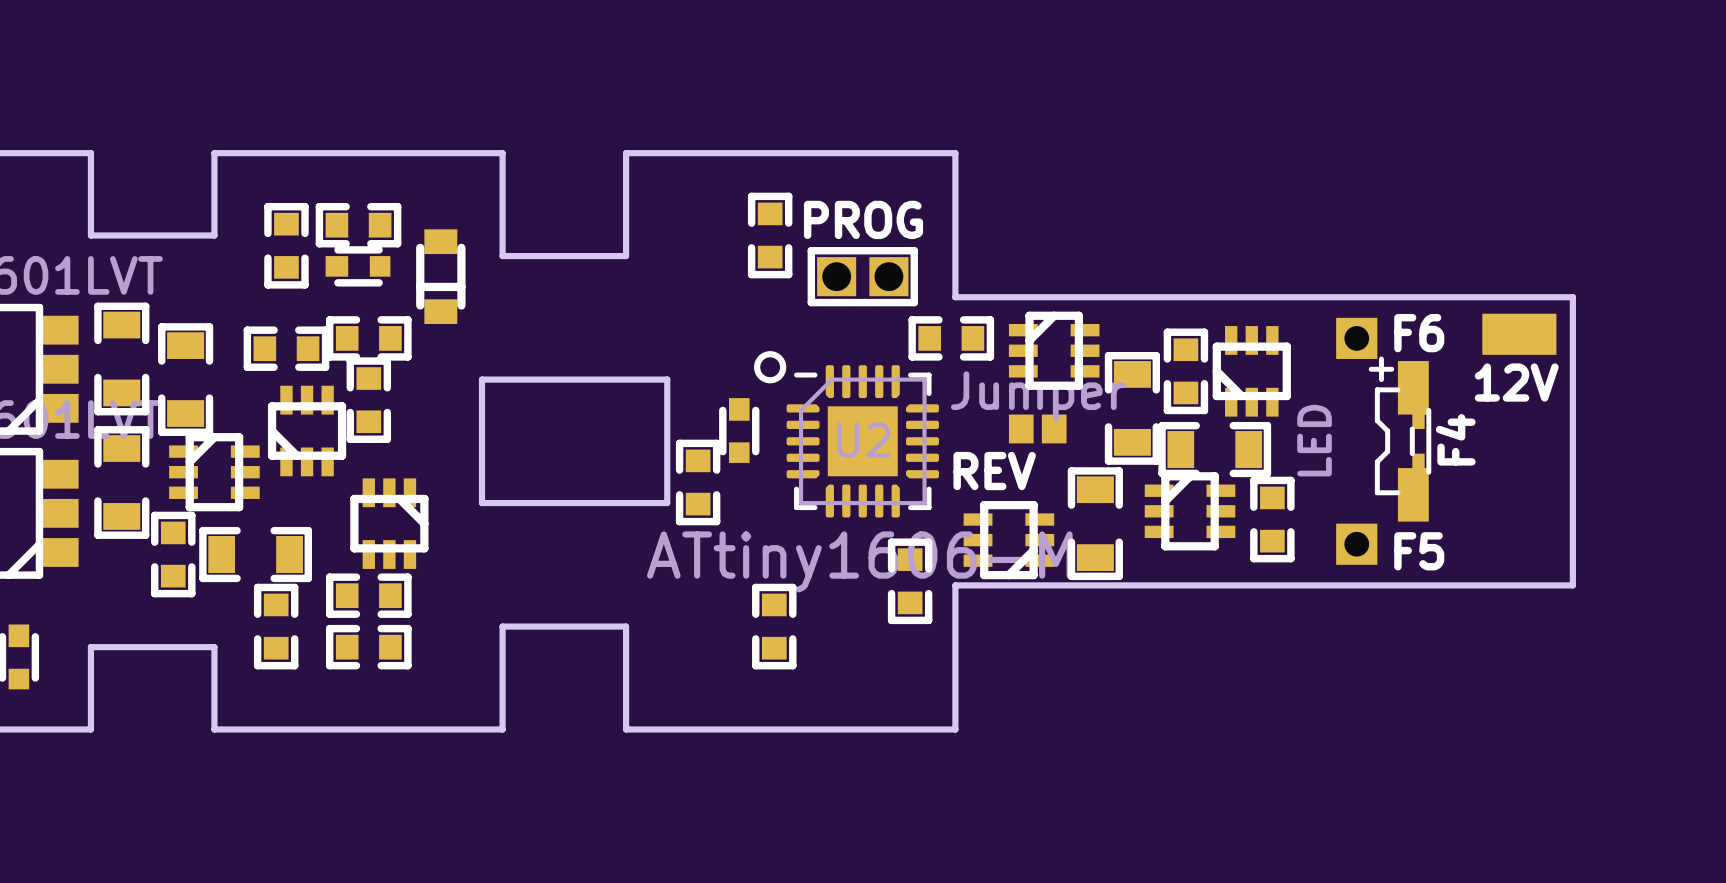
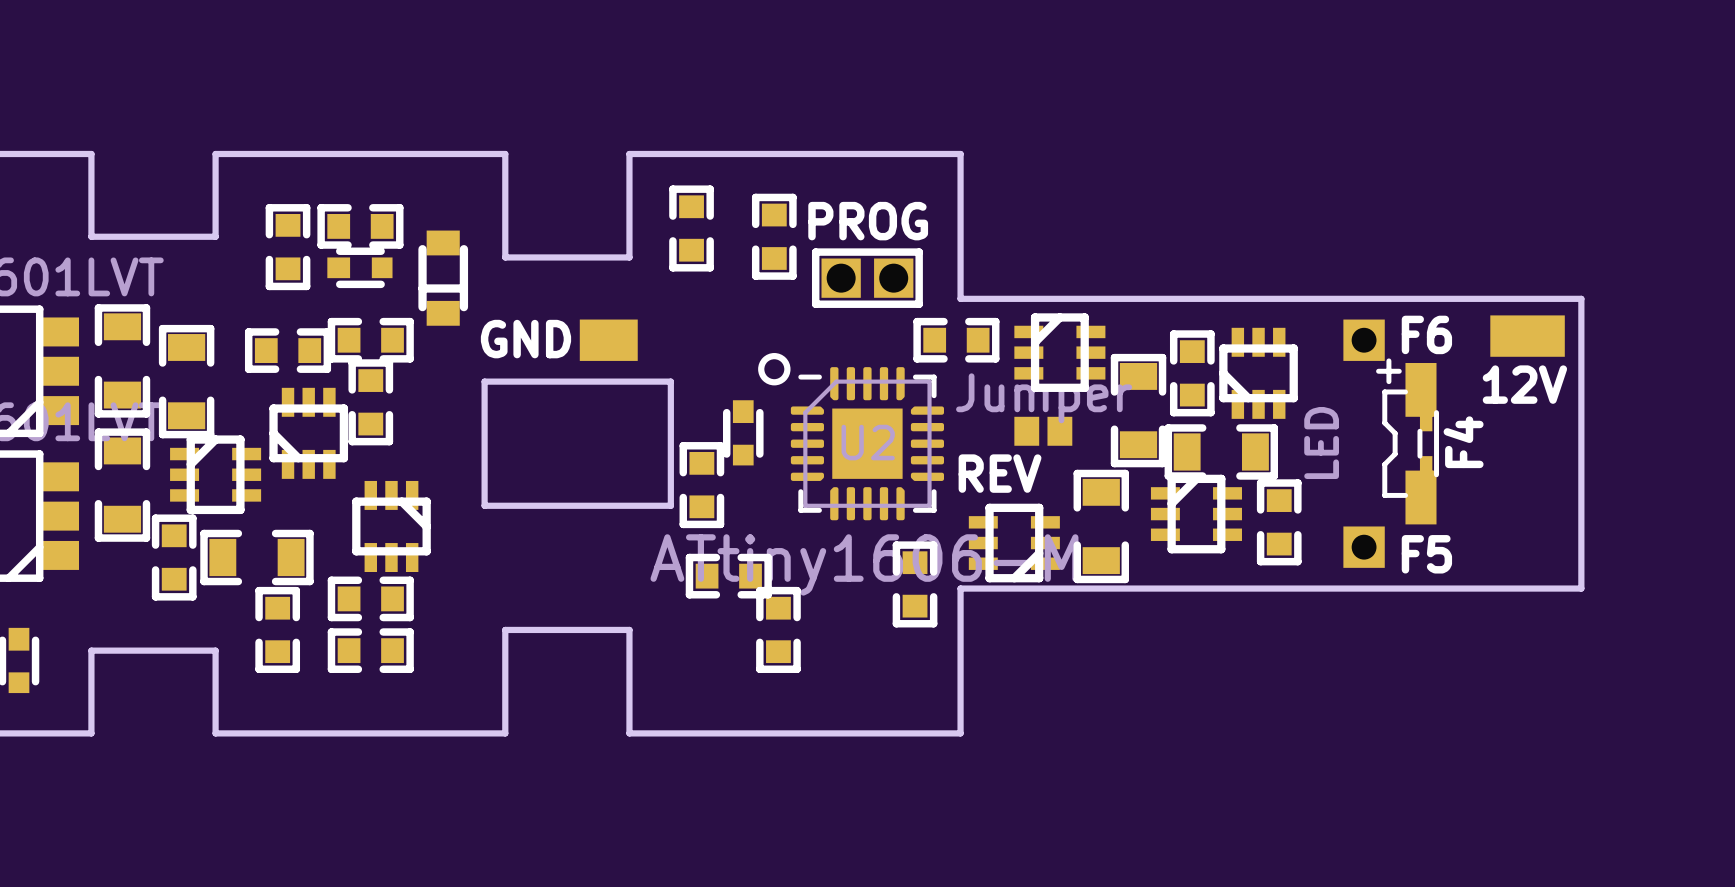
part: none -> (691, 228)
text: none -> GND (525, 339)
part: none -> (608, 340)
part: none -> (728, 576)

